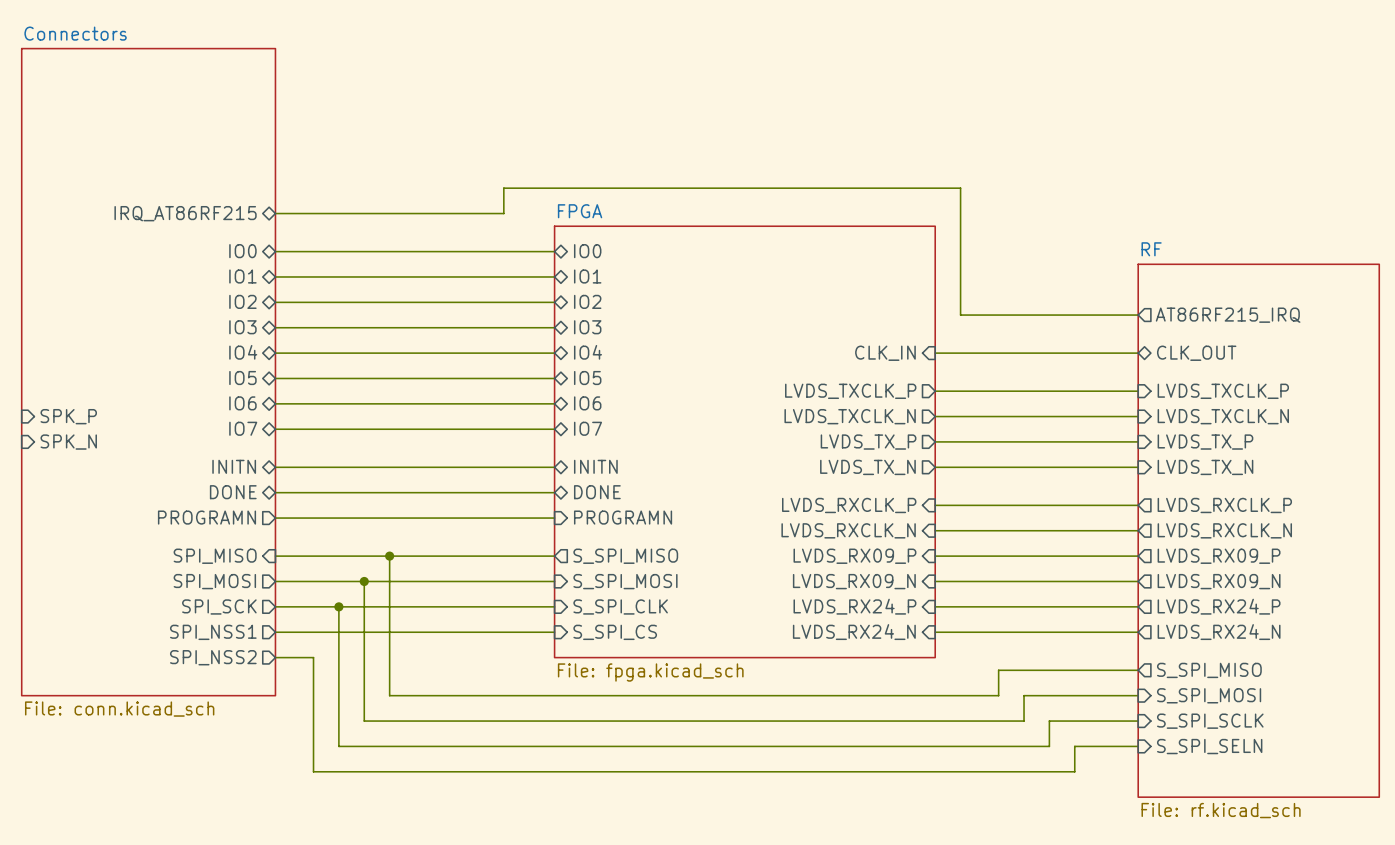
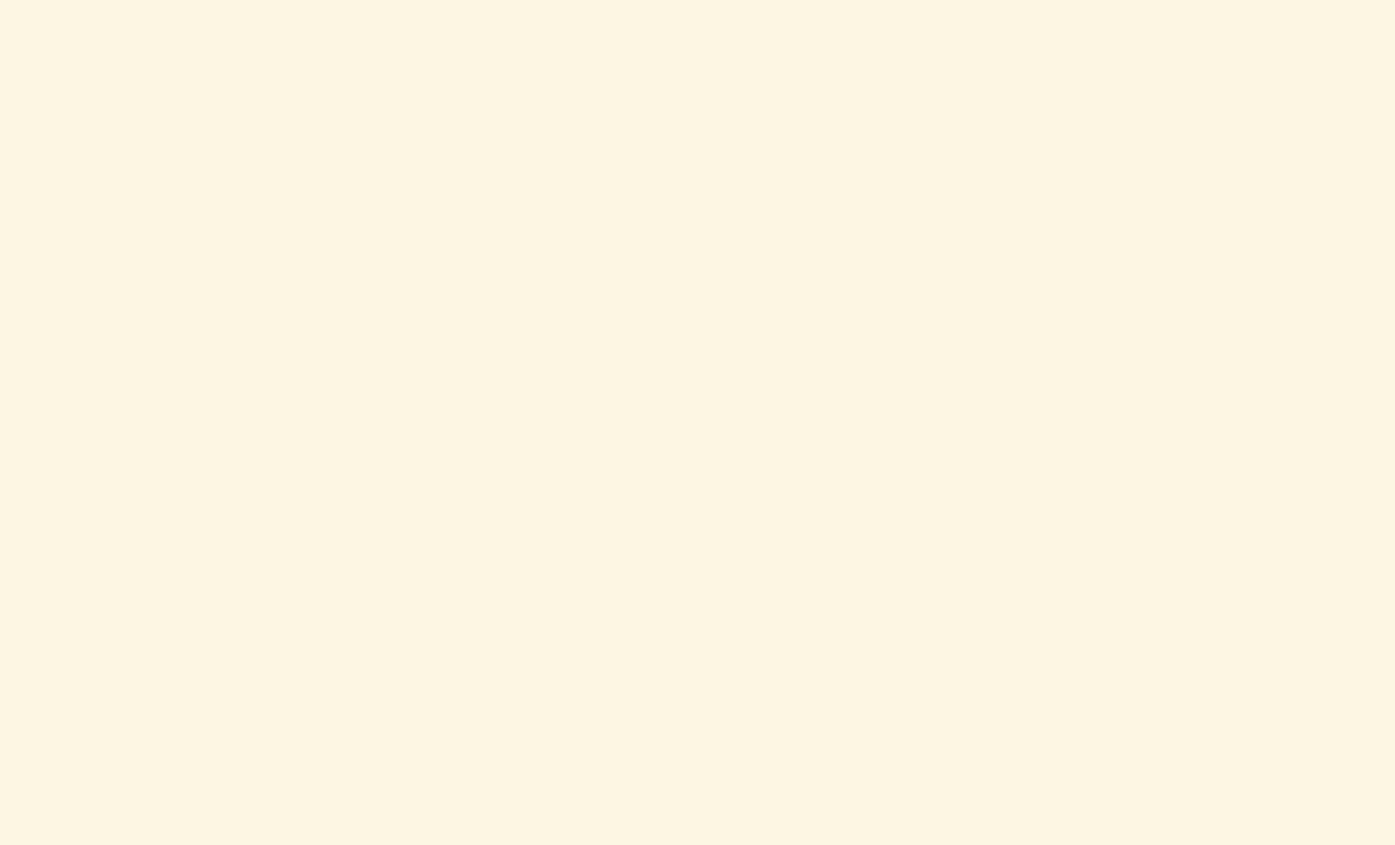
sheet pin: IRQ_AT86RF215 (185, 213) -> none
wire: (275, 213) (503, 213) (503, 188) (960, 188) (960, 315) (1138, 315) -> none
sheet pin: IO0 (242, 251) -> none
wire: (275, 251) (554, 251) -> none
sheet pin: IO0 (587, 251) -> none
sheet pin: IO1 (242, 276) -> none
wire: (275, 276) (554, 276) -> none
sheet pin: IO1 (587, 276) -> none
sheet pin: IO2 (242, 301) -> none
sheet pin: IO2 (587, 301) -> none
wire: (275, 302) (554, 302) -> none
sheet pin: AT86RF215_IRQ (1228, 315) -> none
sheet pin: IO3 (242, 327) -> none
wire: (275, 327) (554, 327) -> none
sheet pin: IO3 (587, 327) -> none
sheet pin: IO4 (243, 352) -> none
sheet pin: IO4 (588, 352) -> none
wire: (275, 353) (554, 353) -> none
sheet pin: CLK_IN (885, 353) -> none
wire: (935, 353) (1138, 353) -> none
sheet pin: CLK_OUT (1196, 353) -> none
sheet Connectors: File: conn.kicad_sch (148, 372) -> none
sheet pin: IO5 (242, 378) -> none
wire: (275, 378) (554, 378) -> none
sheet pin: IO5 (587, 378) -> none
sheet pin: LVDS_TXCLK_P (850, 391) -> none
wire: (935, 391) (1138, 391) -> none
sheet pin: LVDS_TXCLK_P (1223, 391) -> none
sheet pin: IO6 (242, 403) -> none
wire: (275, 403) (554, 403) -> none
sheet pin: IO6 (587, 403) -> none
sheet pin: SPK_P (68, 416) -> none
sheet pin: LVDS_TXCLK_N (850, 416) -> none
wire: (935, 416) (1138, 416) -> none
sheet pin: LVDS_TXCLK_N (1223, 416) -> none
sheet pin: IO7 (243, 428) -> none
sheet pin: IO7 (588, 428) -> none
wire: (275, 429) (554, 429) -> none
sheet FPGA: File: fpga.kicad_sch (744, 441) -> none
wire: (935, 441) (1138, 441) -> none
sheet pin: SPK_N (68, 442) -> none
sheet pin: LVDS_TX_P (868, 442) -> none
sheet pin: LVDS_TX_P (1205, 442) -> none
sheet pin: INITN (234, 466) -> none
sheet pin: INITN (595, 466) -> none
wire: (275, 467) (554, 467) -> none
sheet pin: LVDS_TX_N (867, 467) -> none
wire: (935, 467) (1138, 467) -> none
sheet pin: LVDS_TX_N (1205, 467) -> none
sheet pin: DONE (233, 492) -> none
wire: (275, 492) (554, 492) -> none
sheet pin: DONE (597, 492) -> none
sheet pin: LVDS_RXCLK_P (849, 505) -> none
wire: (935, 505) (1138, 505) -> none
sheet pin: LVDS_RXCLK_P (1224, 505) -> none
sheet pin: PROGRAMN (206, 517) -> none
sheet pin: PROGRAMN (623, 517) -> none
wire: (275, 518) (554, 518) -> none
sheet pin: LVDS_RXCLK_N (848, 530) -> none
wire: (935, 530) (1138, 530) -> none
sheet pin: LVDS_RXCLK_N (1224, 530) -> none
sheet RF: File: rf.kicad_sch (1258, 530) -> none
sheet pin: SPI_MISO (215, 556) -> none
wire: (275, 556) (554, 556) -> none
wire: (389, 556) (389, 695) (998, 695) (998, 670) (1138, 670) -> none
junction: (389, 556) -> none
sheet pin: S_SPI_MISO (625, 556) -> none
sheet pin: LVDS_RX09_P (854, 556) -> none
wire: (935, 556) (1138, 556) -> none
sheet pin: LVDS_RX09_P (1219, 556) -> none
sheet pin: SPI_MOSI (214, 581) -> none
wire: (275, 581) (554, 581) -> none
wire: (364, 581) (364, 721) (1024, 721) (1024, 695) (1138, 695) -> none
junction: (364, 581) -> none
sheet pin: S_SPI_MOSI (625, 581) -> none
sheet pin: LVDS_RX09_N (854, 581) -> none
wire: (935, 581) (1138, 581) -> none
sheet pin: LVDS_RX09_N (1219, 581) -> none
sheet pin: SPI_SCK (219, 606) -> none
wire: (275, 606) (554, 606) -> none
wire: (338, 606) (338, 746) (1049, 746) (1049, 721) (1138, 721) -> none
junction: (338, 606) -> none
sheet pin: S_SPI_CLK (620, 606) -> none
sheet pin: LVDS_RX24_P (854, 606) -> none
wire: (935, 606) (1138, 606) -> none
sheet pin: LVDS_RX24_P (1219, 606) -> none
sheet pin: SPI_NSS1 (213, 632) -> none
wire: (275, 632) (554, 632) -> none
sheet pin: S_SPI_CS (615, 632) -> none
sheet pin: LVDS_RX24_N (854, 632) -> none
wire: (935, 632) (1138, 632) -> none
sheet pin: LVDS_RX24_N (1219, 632) -> none
sheet pin: SPI_NSS2 (213, 657) -> none
wire: (275, 657) (313, 657) (313, 771) (1074, 771) (1074, 746) (1138, 746) -> none
sheet pin: S_SPI_MISO (1209, 670) -> none
sheet pin: S_SPI_MOSI (1209, 695) -> none
sheet pin: S_SPI_SCLK (1210, 721) -> none
sheet pin: S_SPI_SELN (1209, 746) -> none

